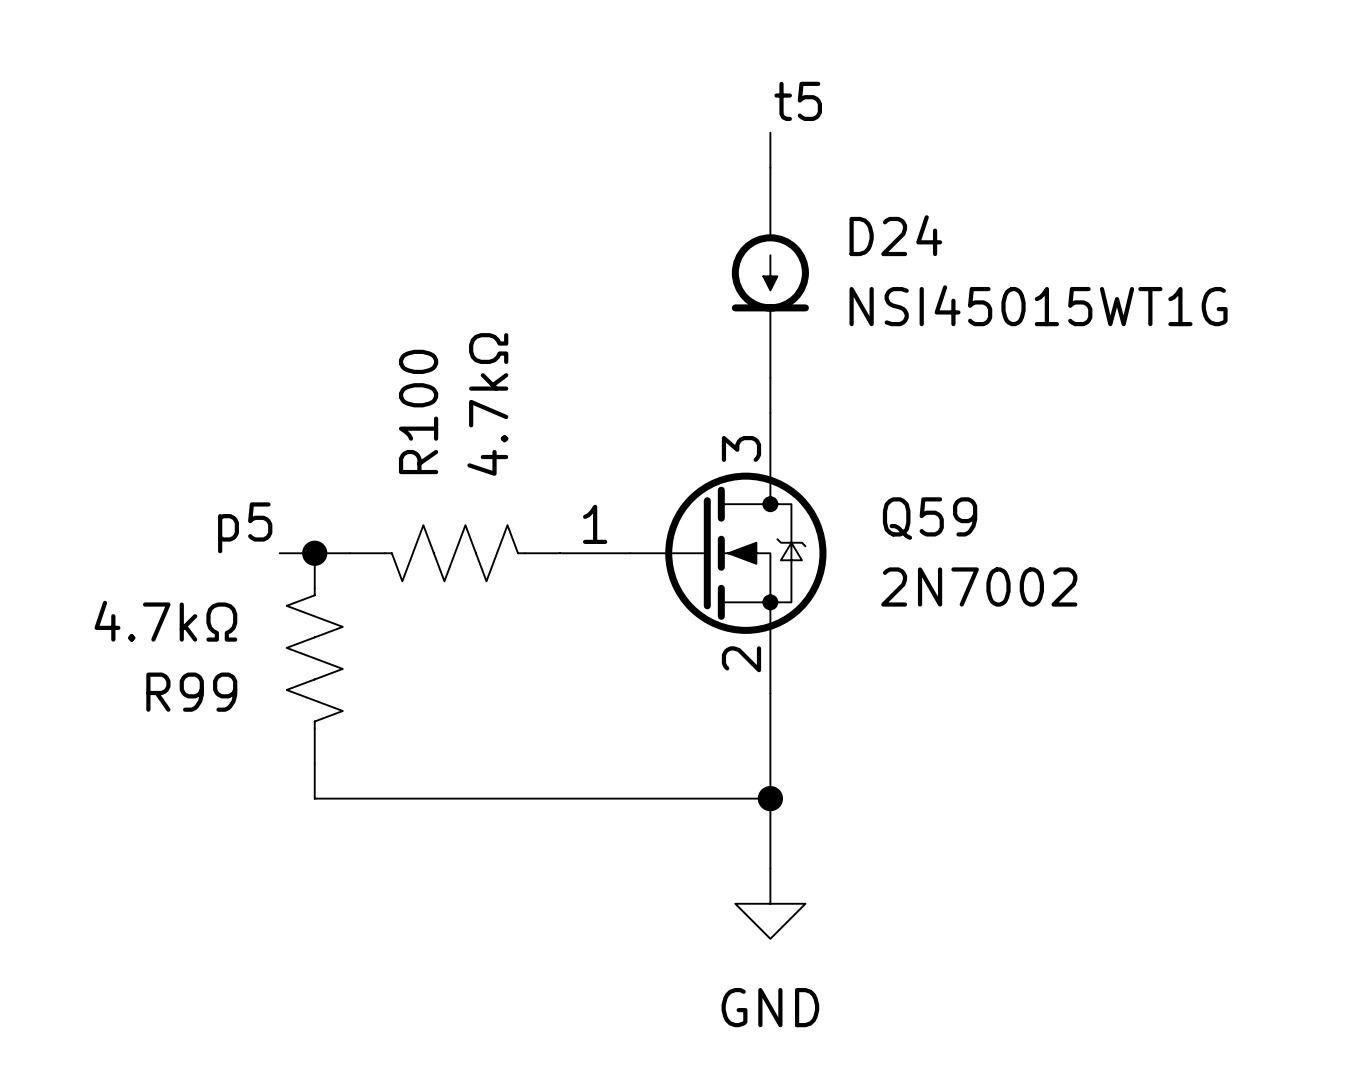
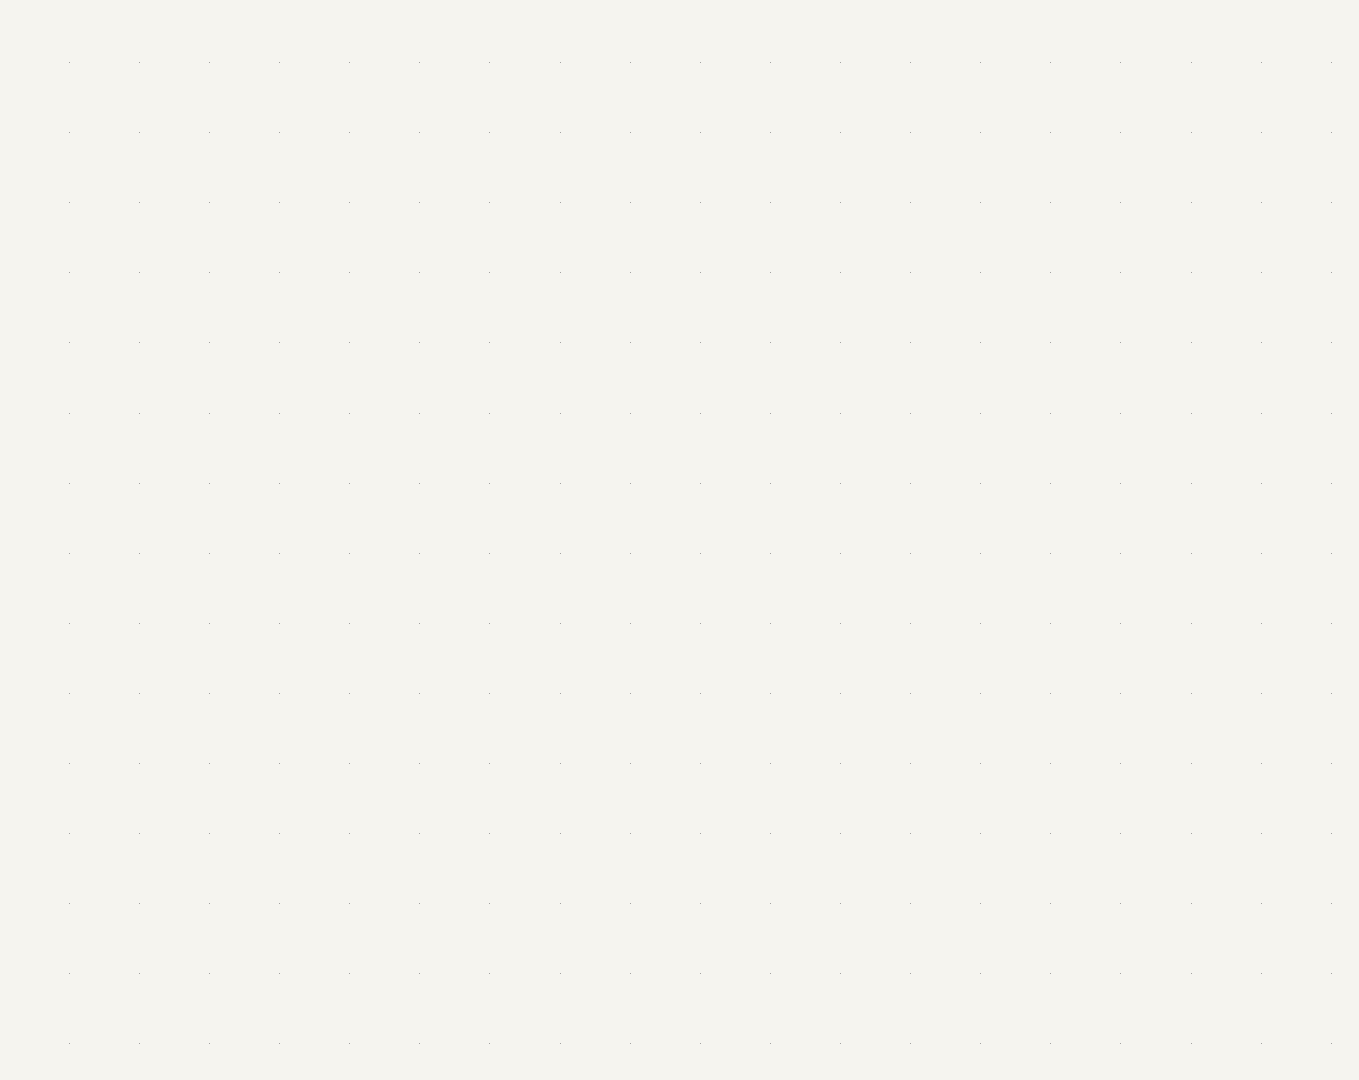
label: t5 (798, 101) -> none
wire: (770, 132) (770, 167) -> none
D24: NSI45015WT1G (770, 272) -> none
wire: (770, 378) (770, 413) -> none
label: p5 (245, 527) -> none
wire: (279, 553) (349, 553) -> none
junction: (314, 553) -> none
R100: 4.7kΩ (454, 553) -> none
Q59: 2N7002 (693, 553) -> none
R99: 4.7kΩ (314, 658) -> none
wire: (770, 693) (770, 868) -> none
wire: (314, 763) (314, 798) (770, 798) -> none
junction: (770, 798) -> none
power symbol: GND (770, 903) -> none

